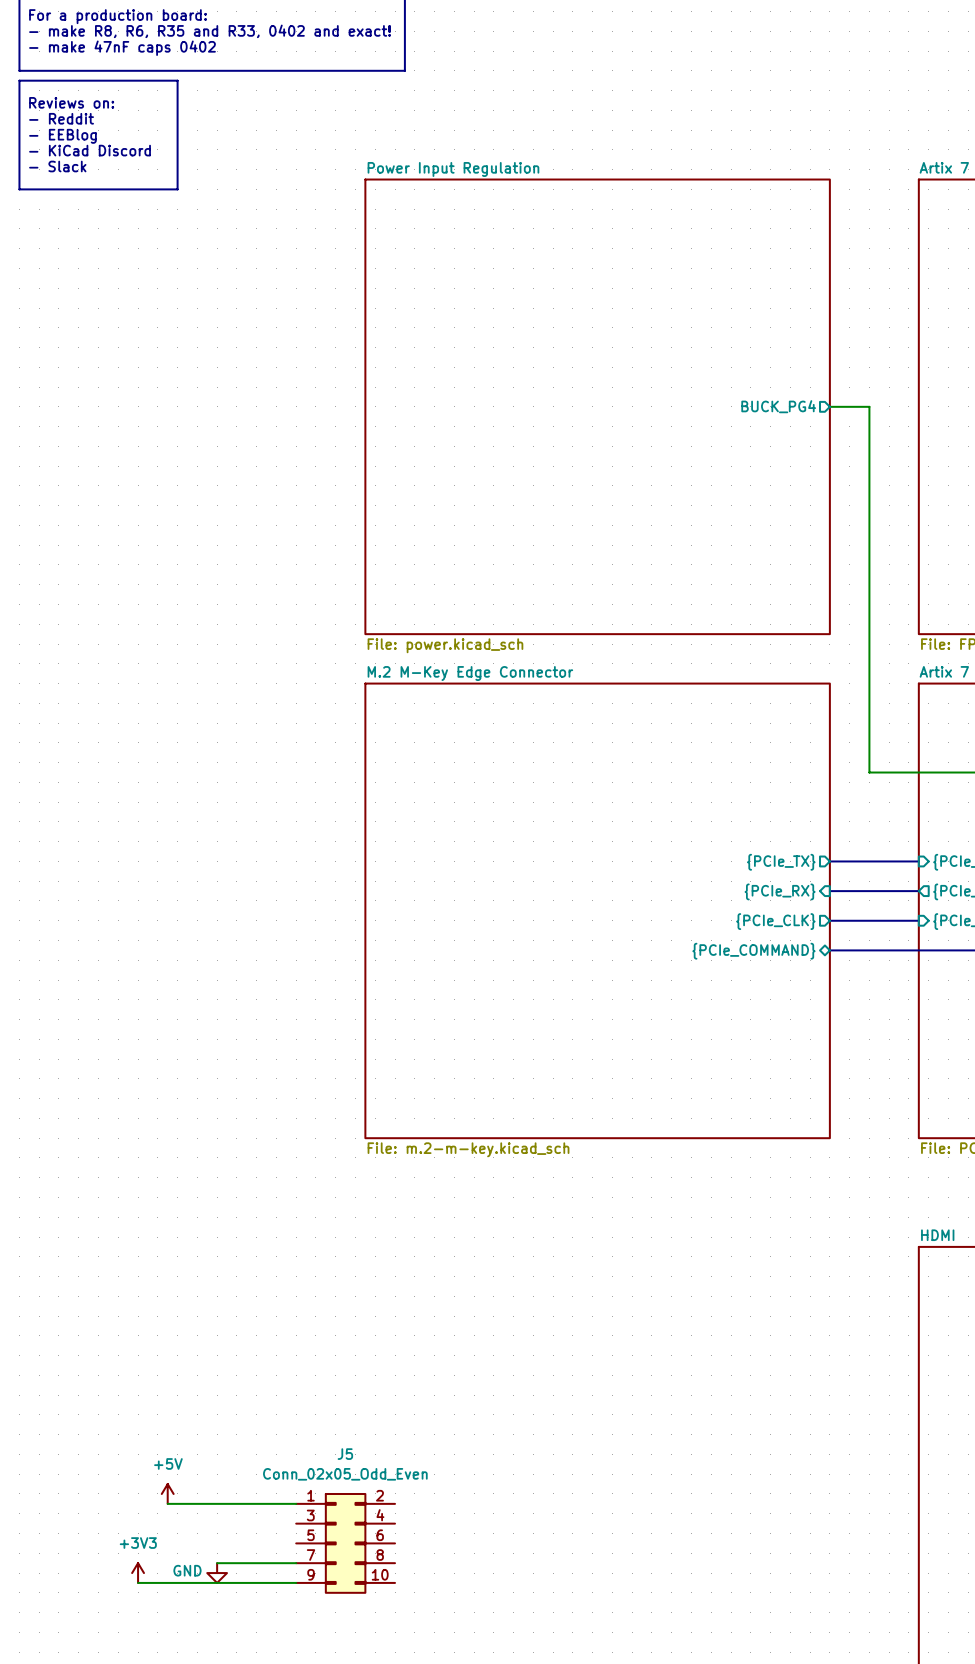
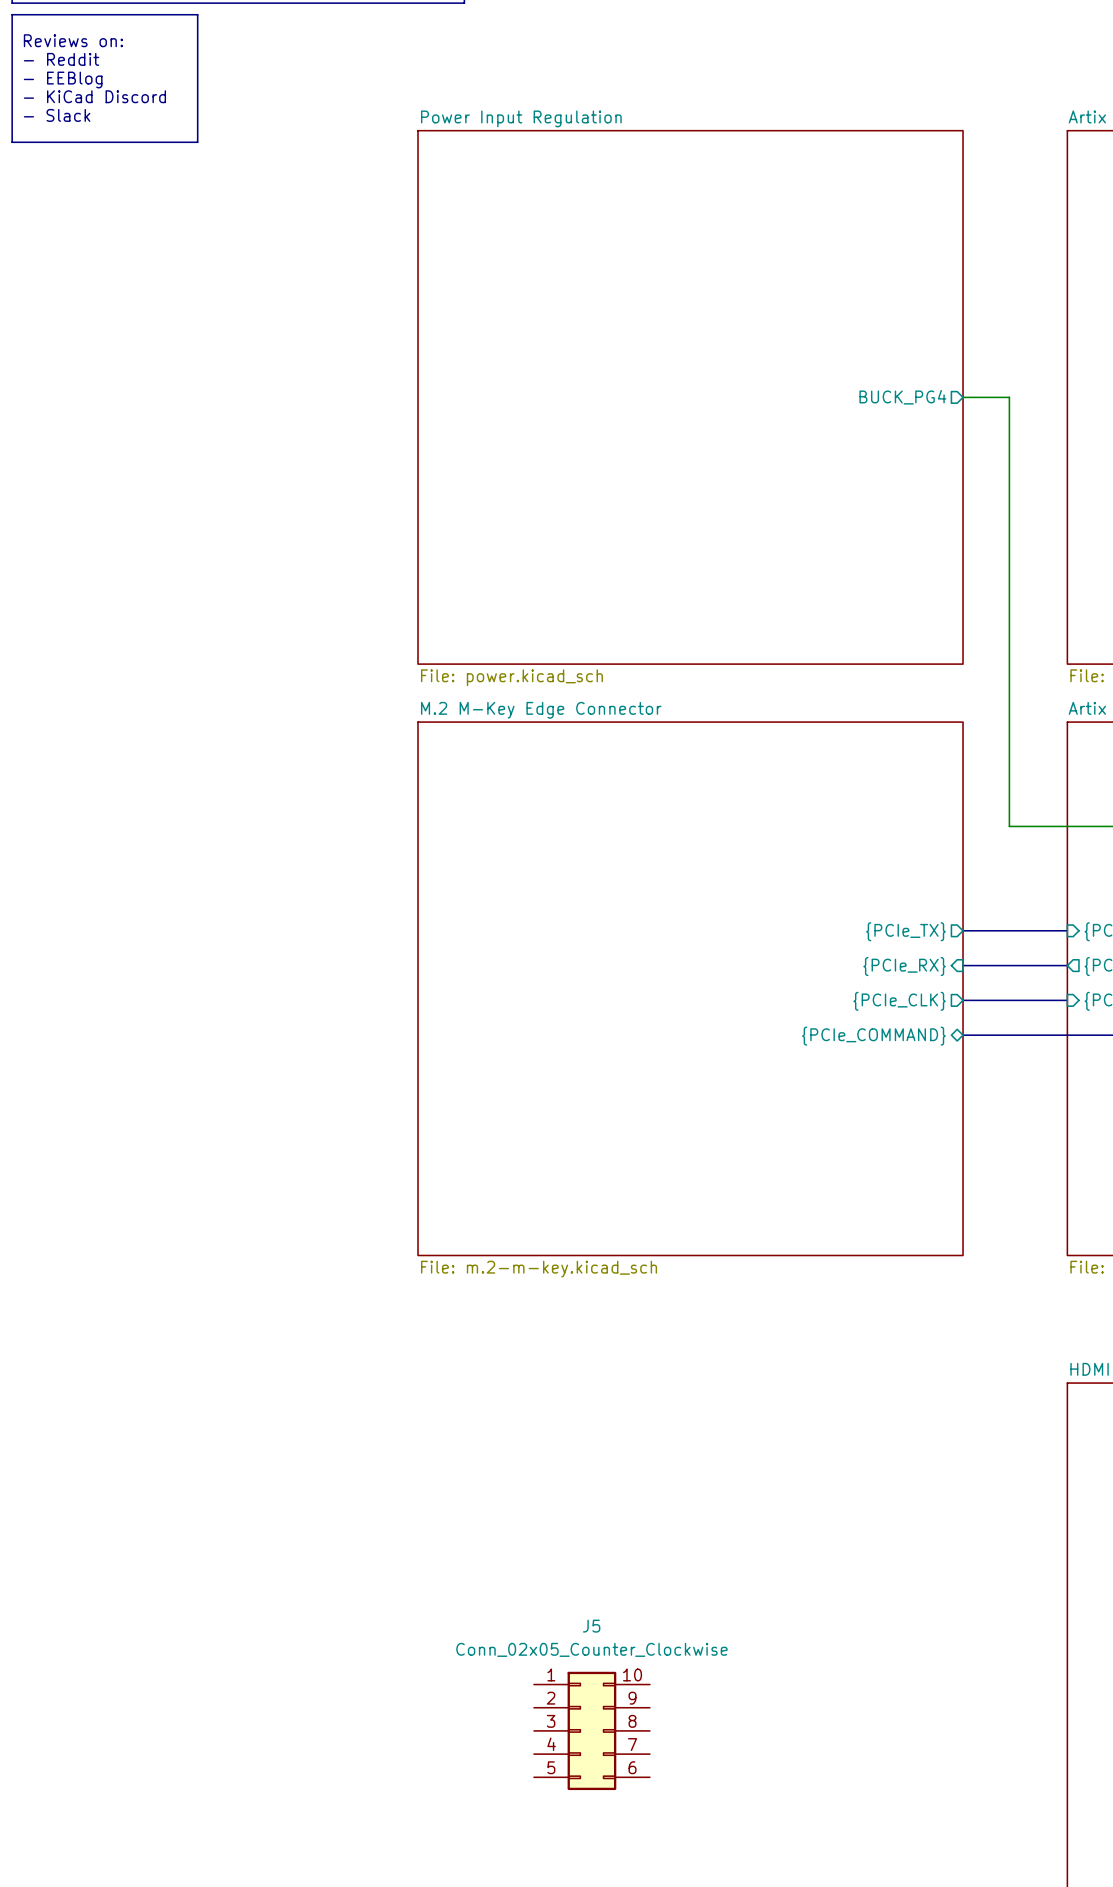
J5 value: Conn_02x05_Odd_Even (345, 1474) -> Conn_02x05_Counter_Clockwise (591, 1649)
power symbol: +5V (167, 1493) -> none
J5 symbol: [296, 1493, 396, 1594] -> [533, 1671, 650, 1791]
wire: (167, 1503) (296, 1503) -> none
wire: (217, 1563) (296, 1563) -> none
power symbol: +3V3 (138, 1573) -> none
power symbol: GND (217, 1573) -> none
wire: (138, 1582) (296, 1582) -> none

